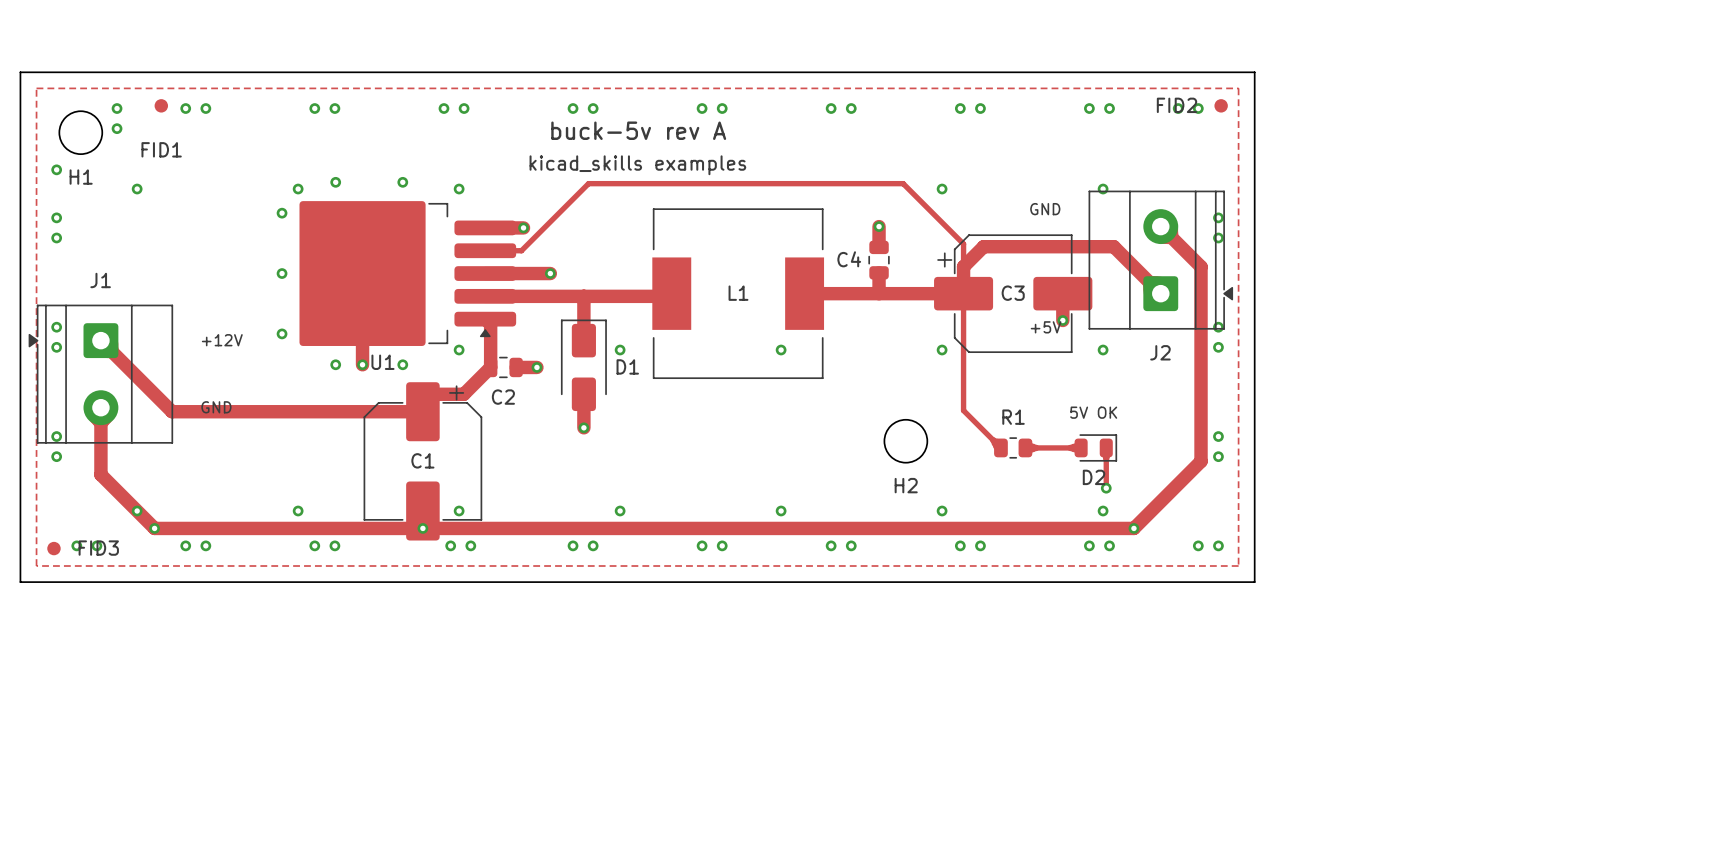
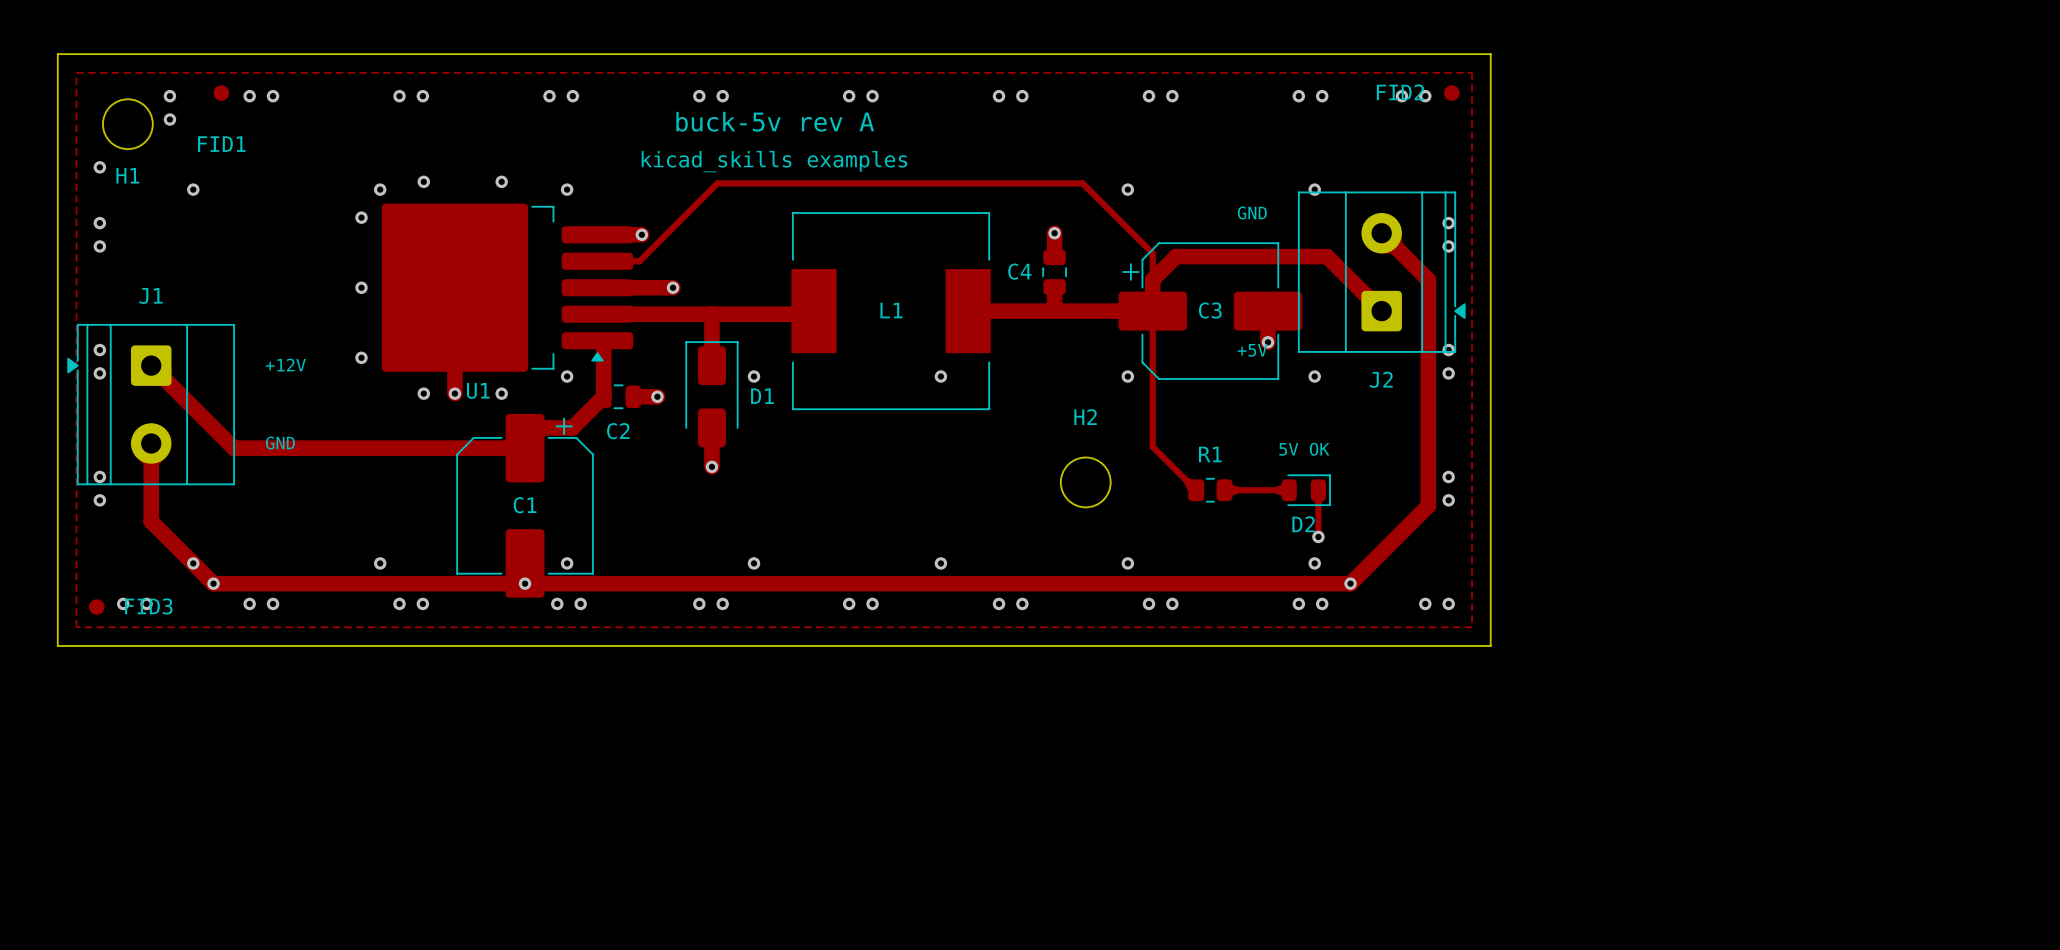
H2 name position: H2 (906, 485) -> H2 (1085, 417)

